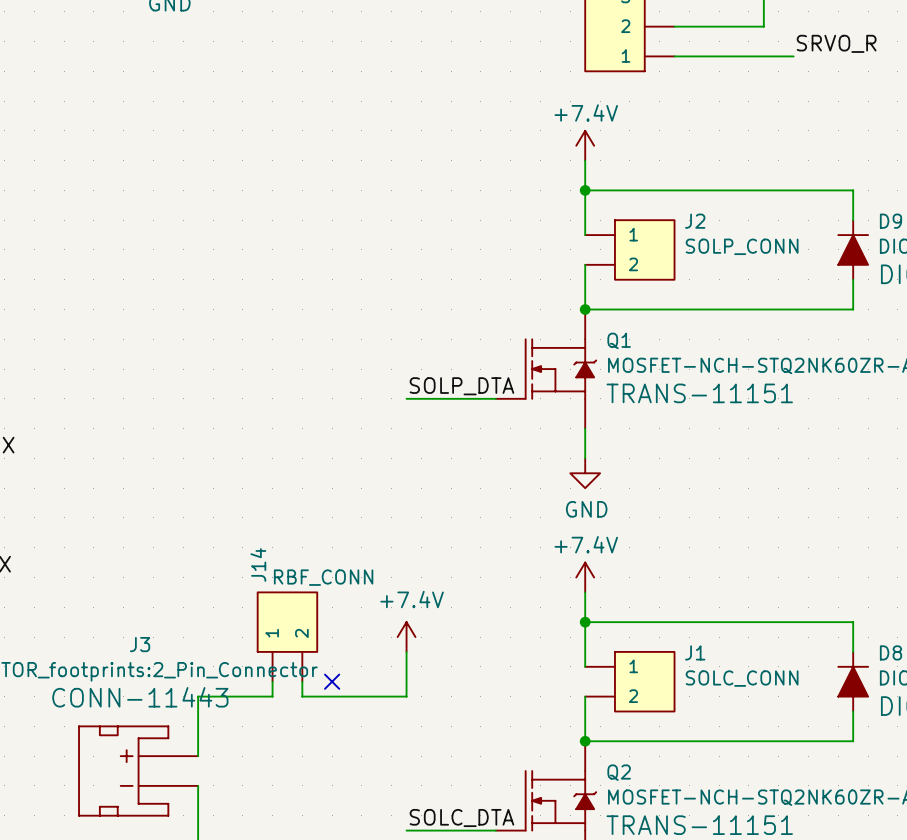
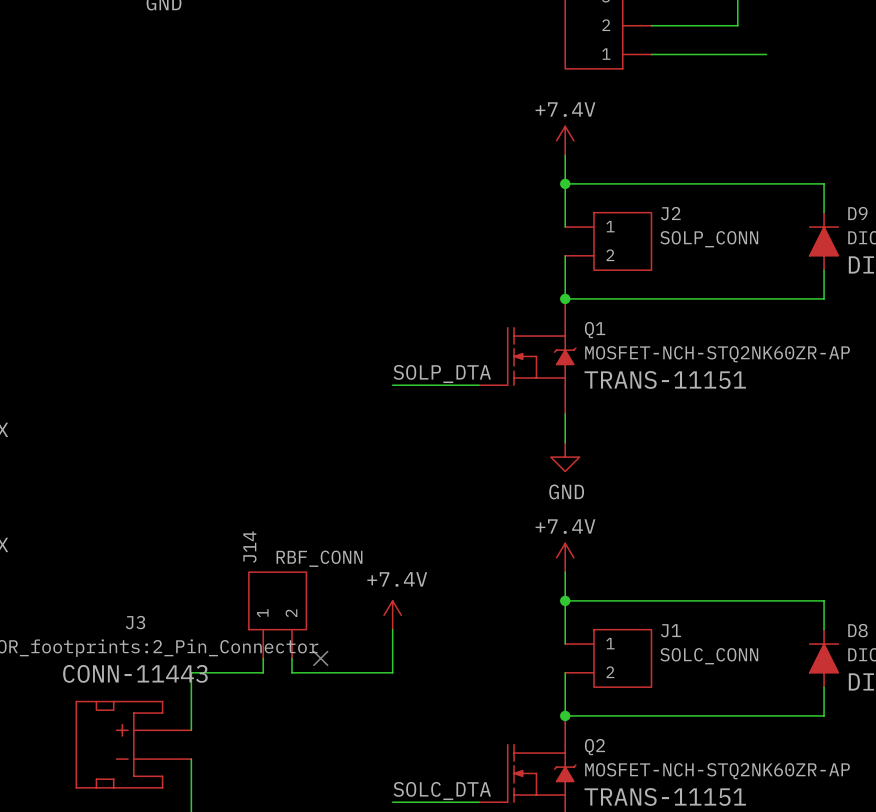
label: SRVO_R (836, 43) -> none

